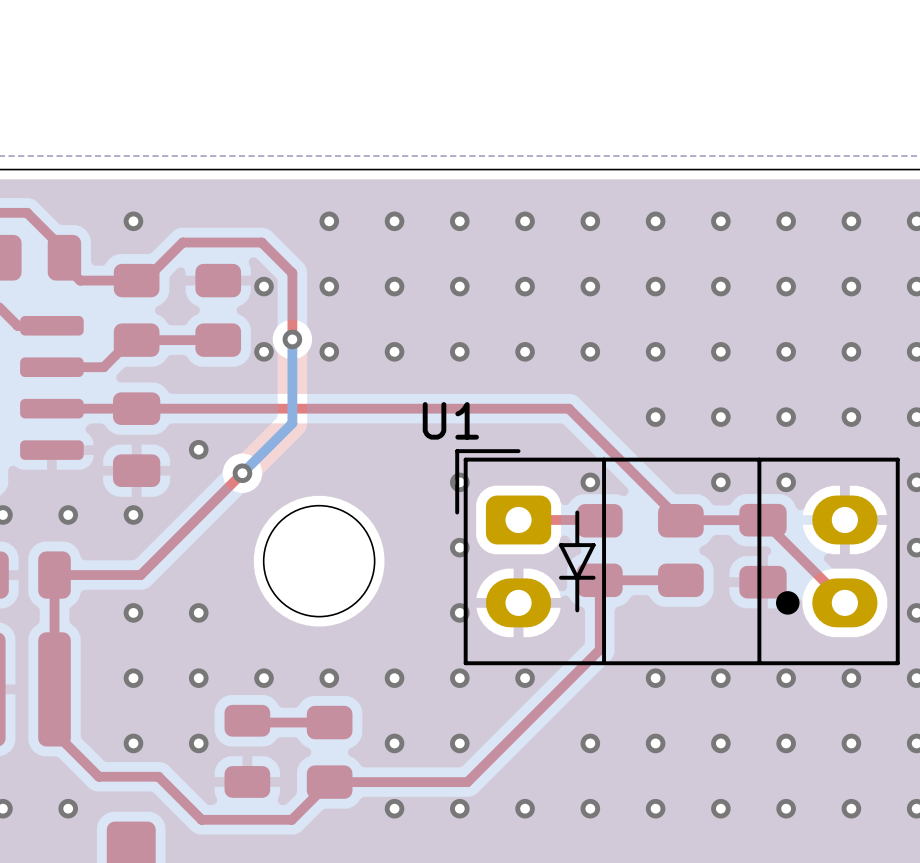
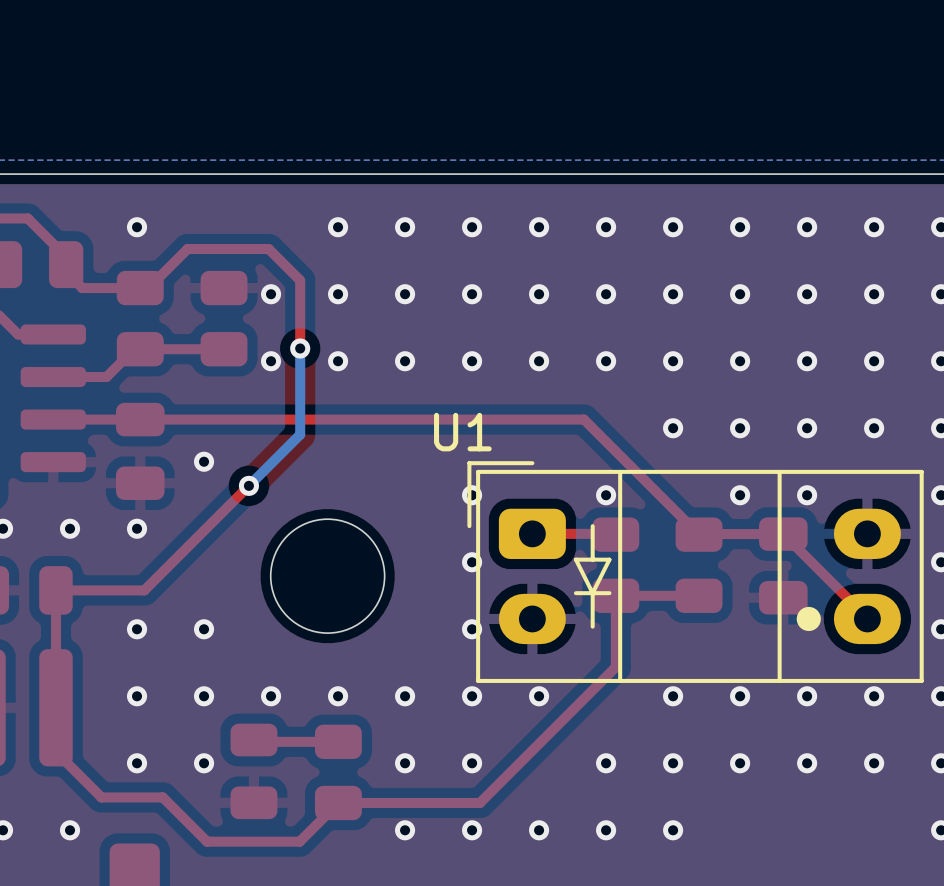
via: (720, 808) -> none
via: (786, 808) -> none
via: (851, 808) -> none

